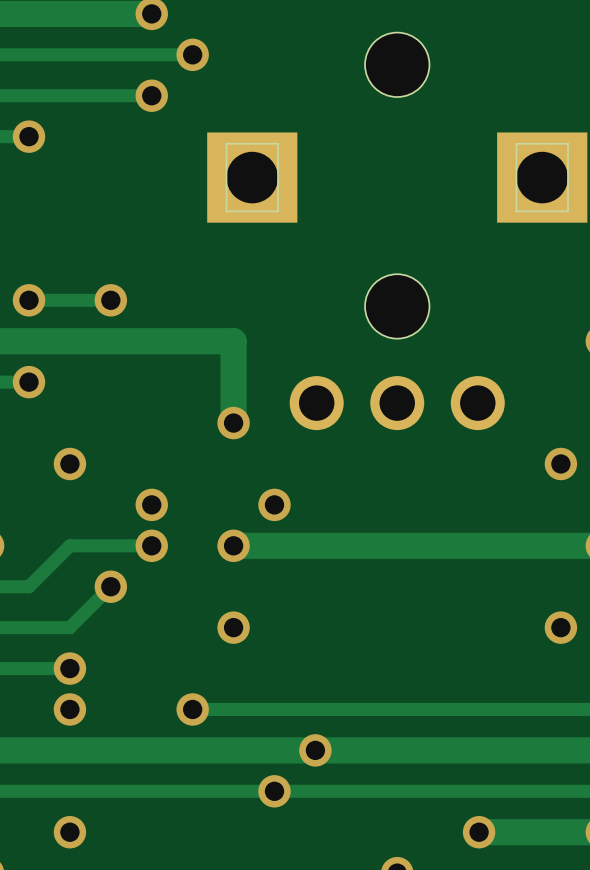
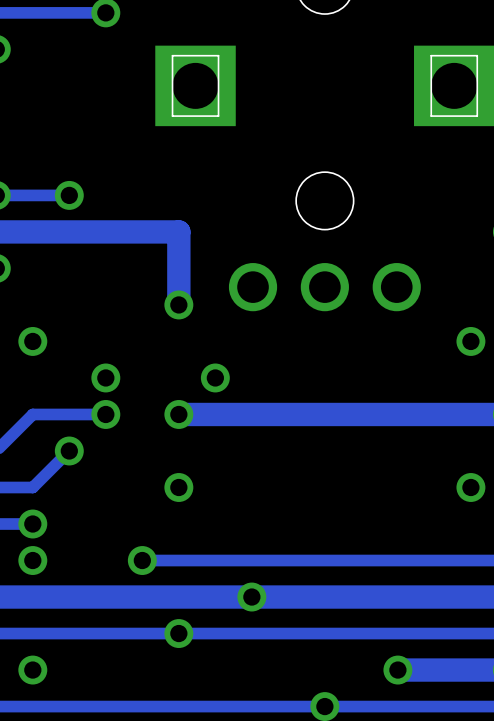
via position: (274, 791) -> (178, 633)

